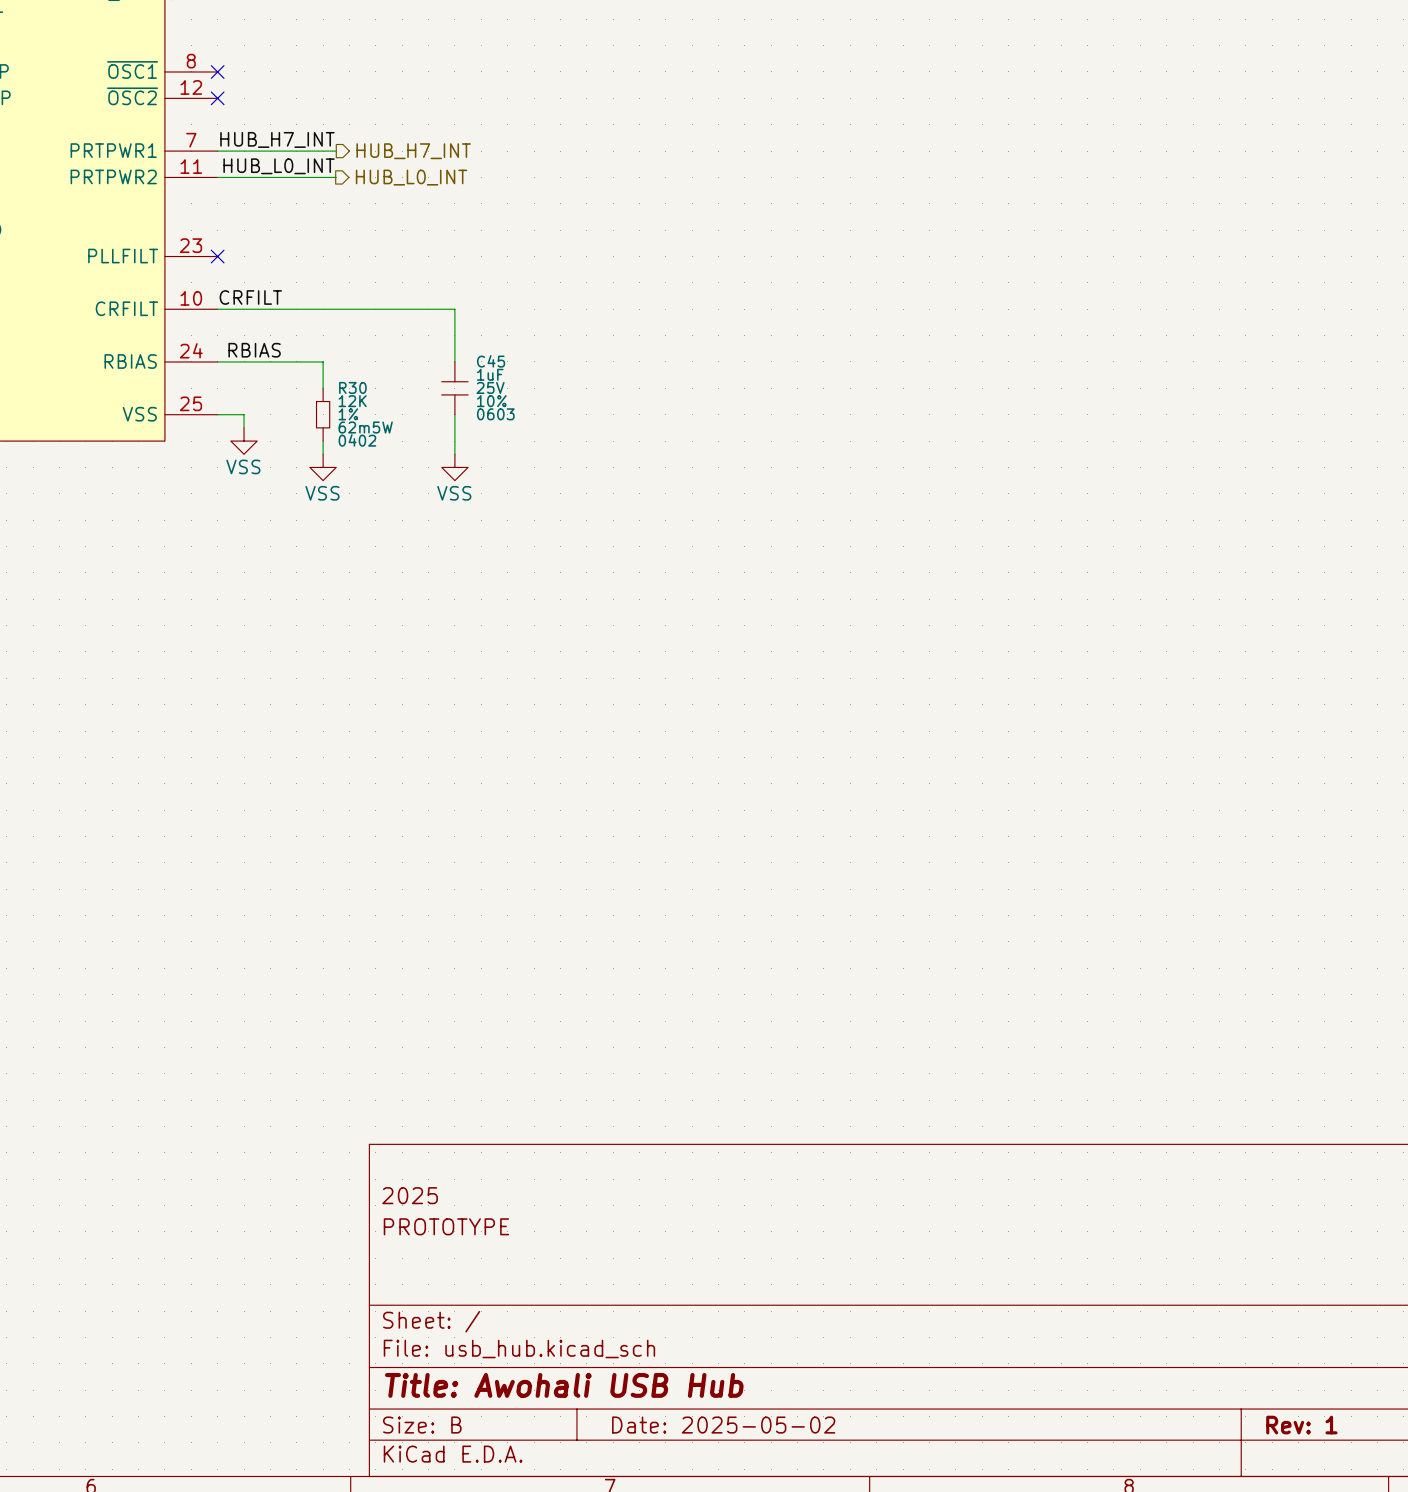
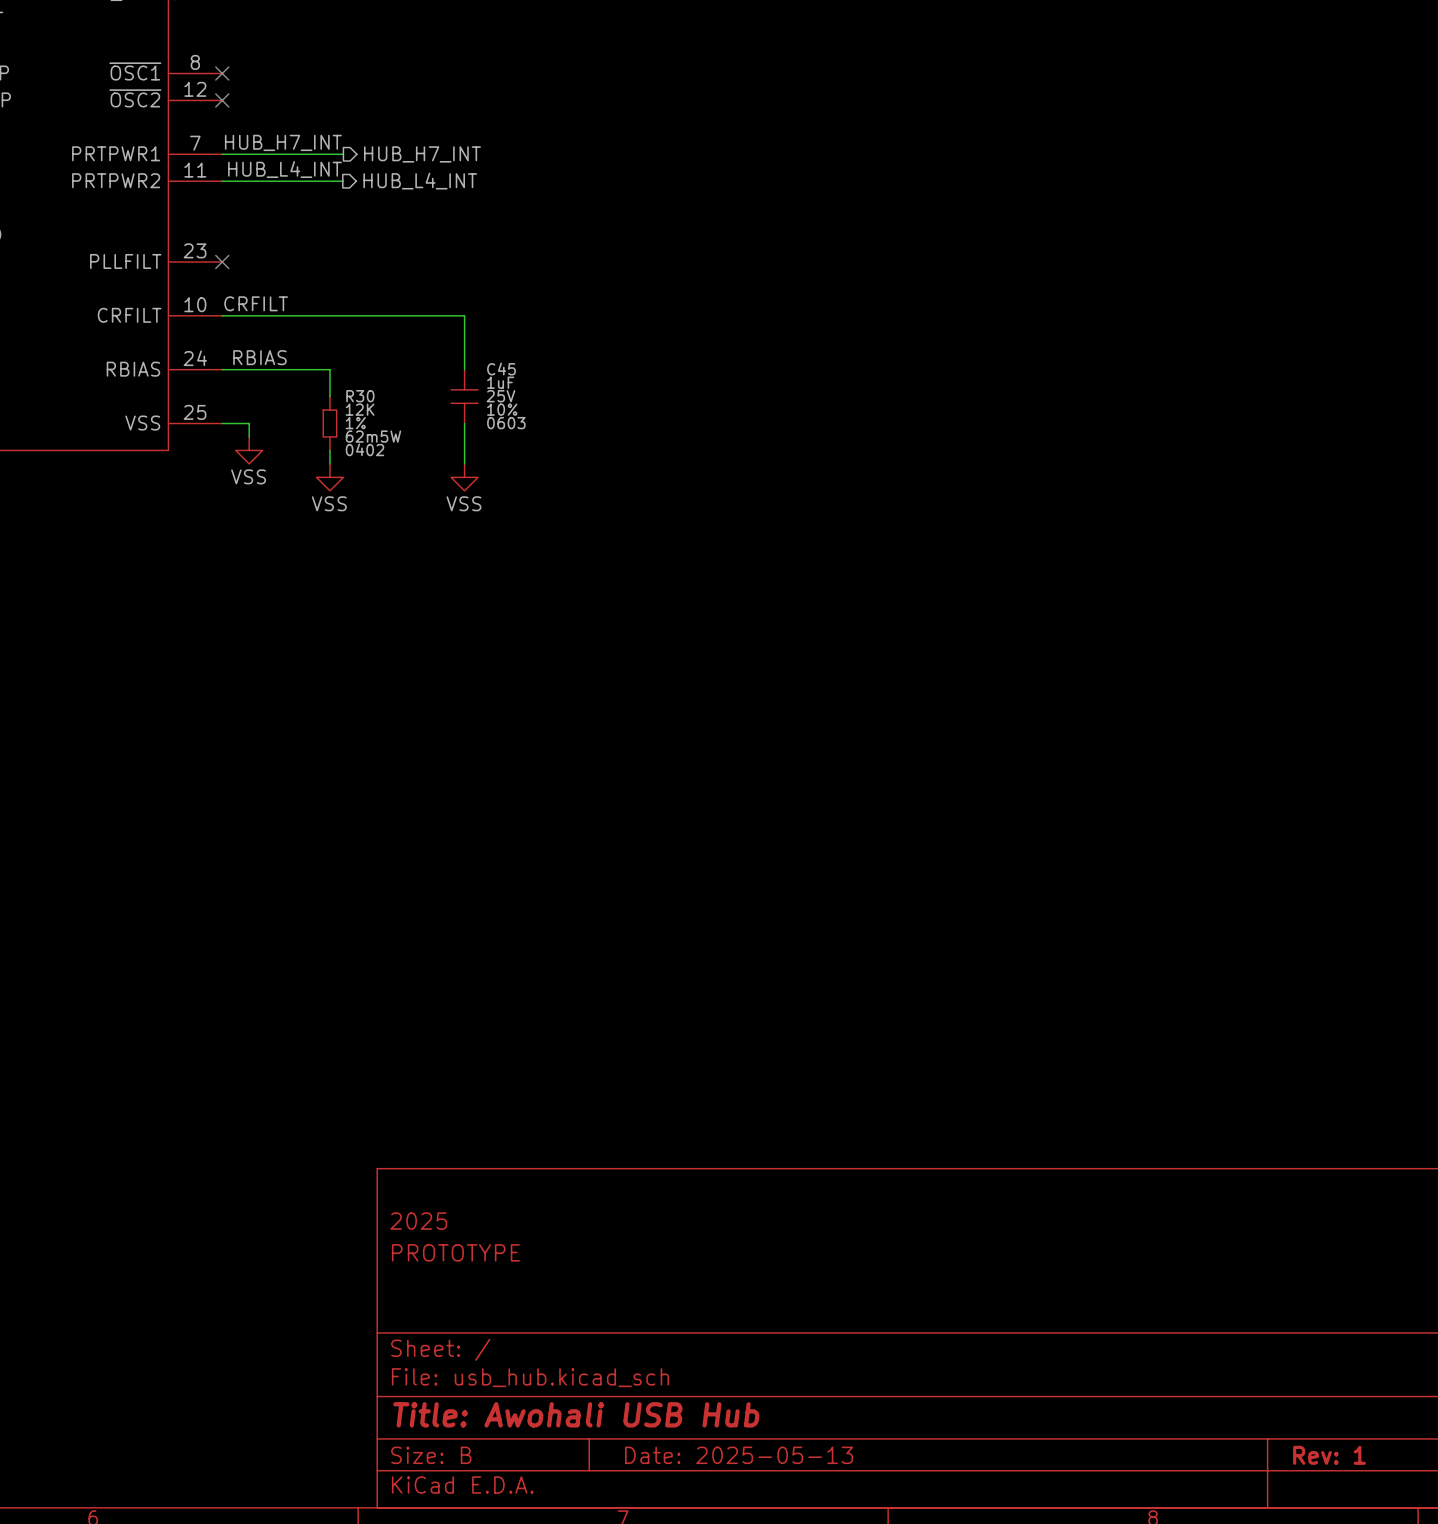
label: HUB_L0_INT (279, 166) -> HUB_L4_INT (284, 169)
hierarchical label: HUB_L0_INT (411, 177) -> HUB_L4_INT (420, 181)
title block: Date: 2025-05-02 (723, 1425) -> Date: 2025-05-13 (739, 1455)

